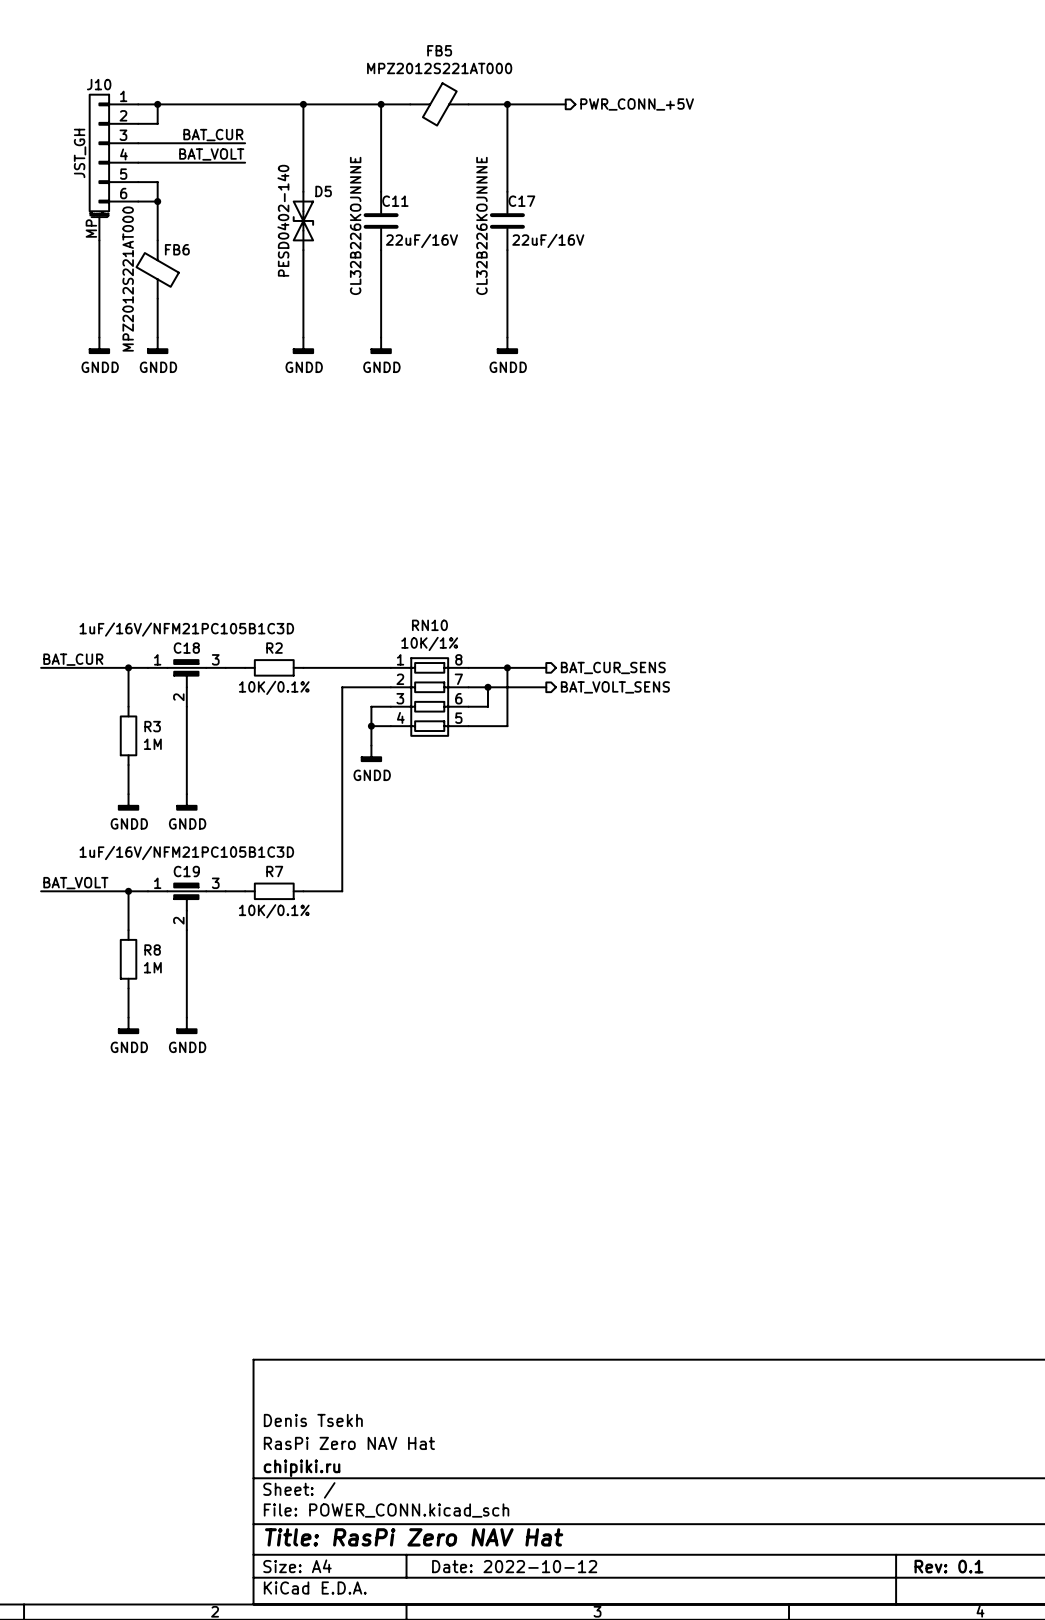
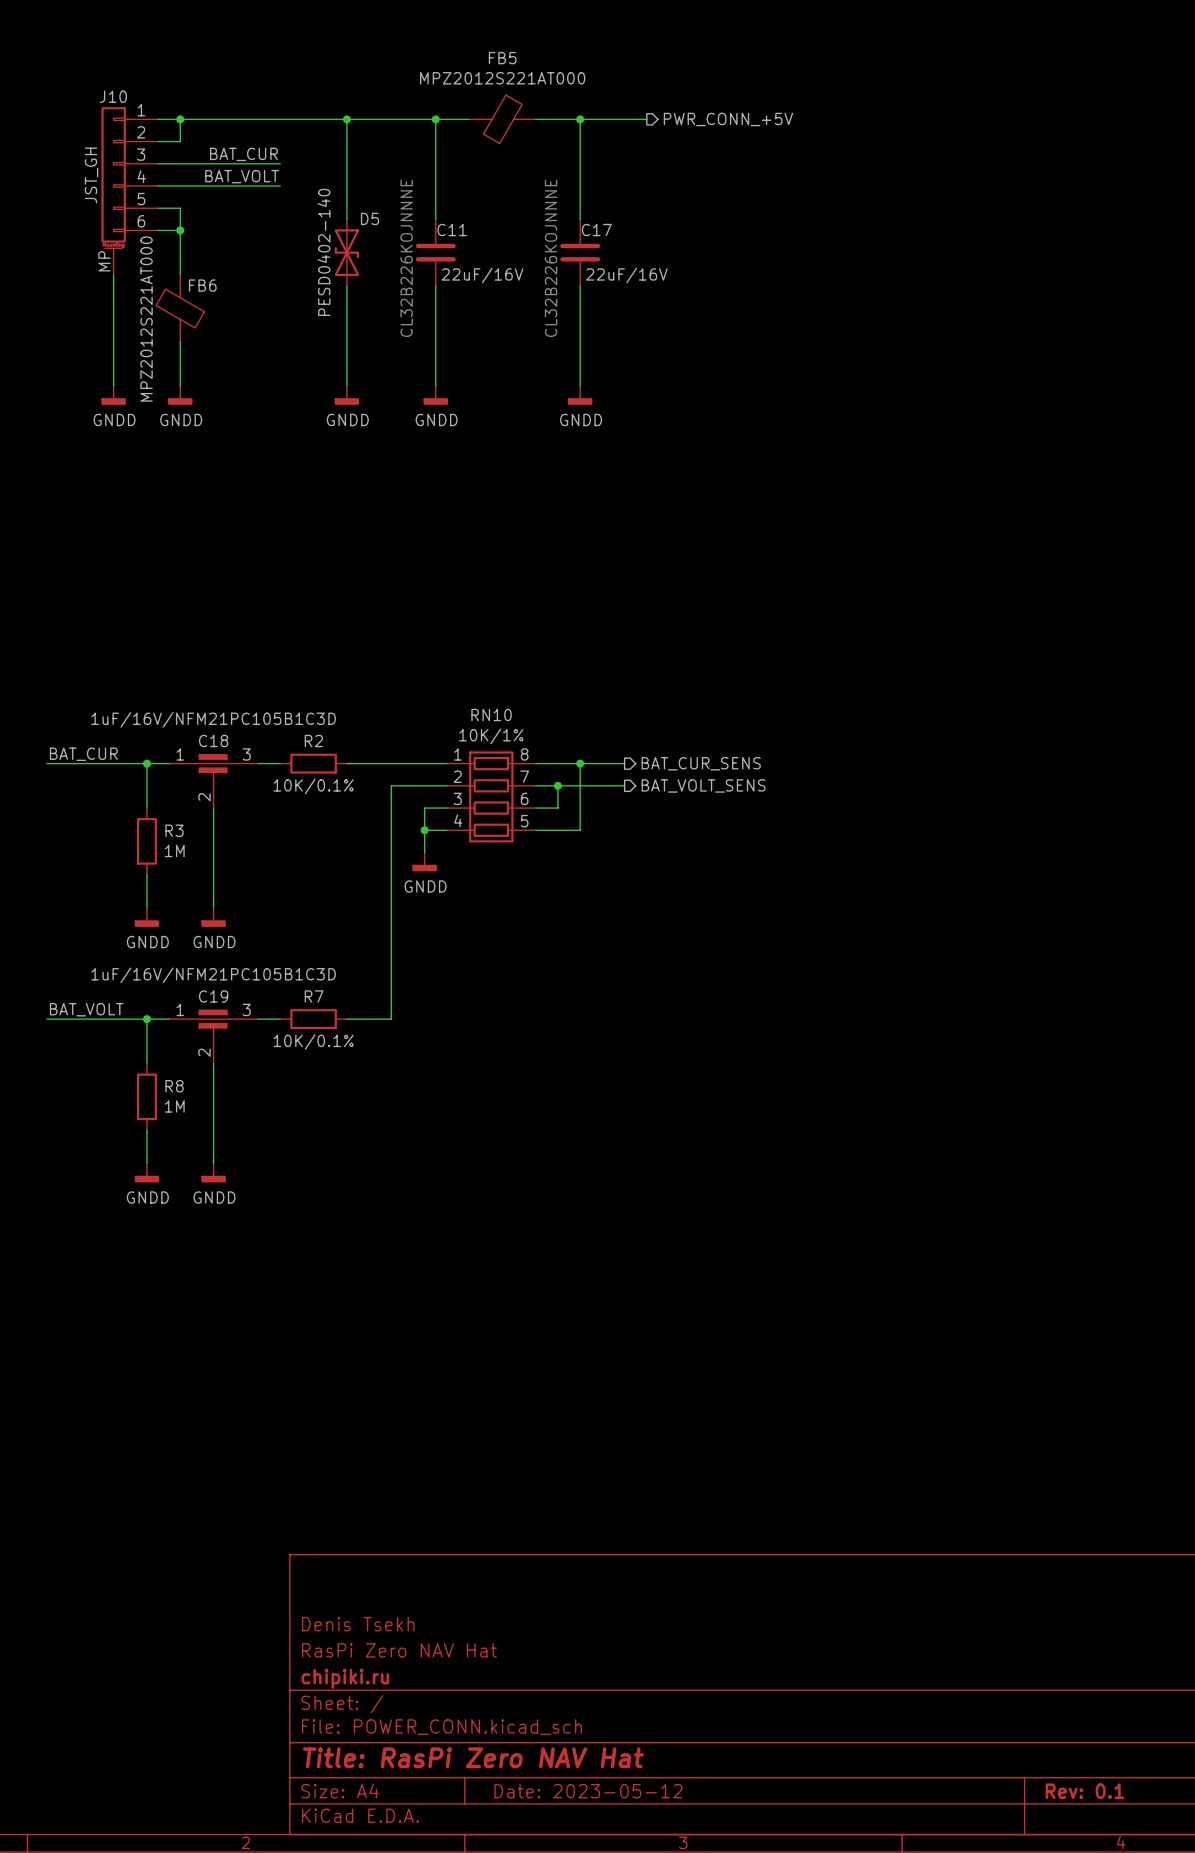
title block: Date: 2022-10-12 (514, 1566) -> Date: 2023-05-12 (588, 1791)

